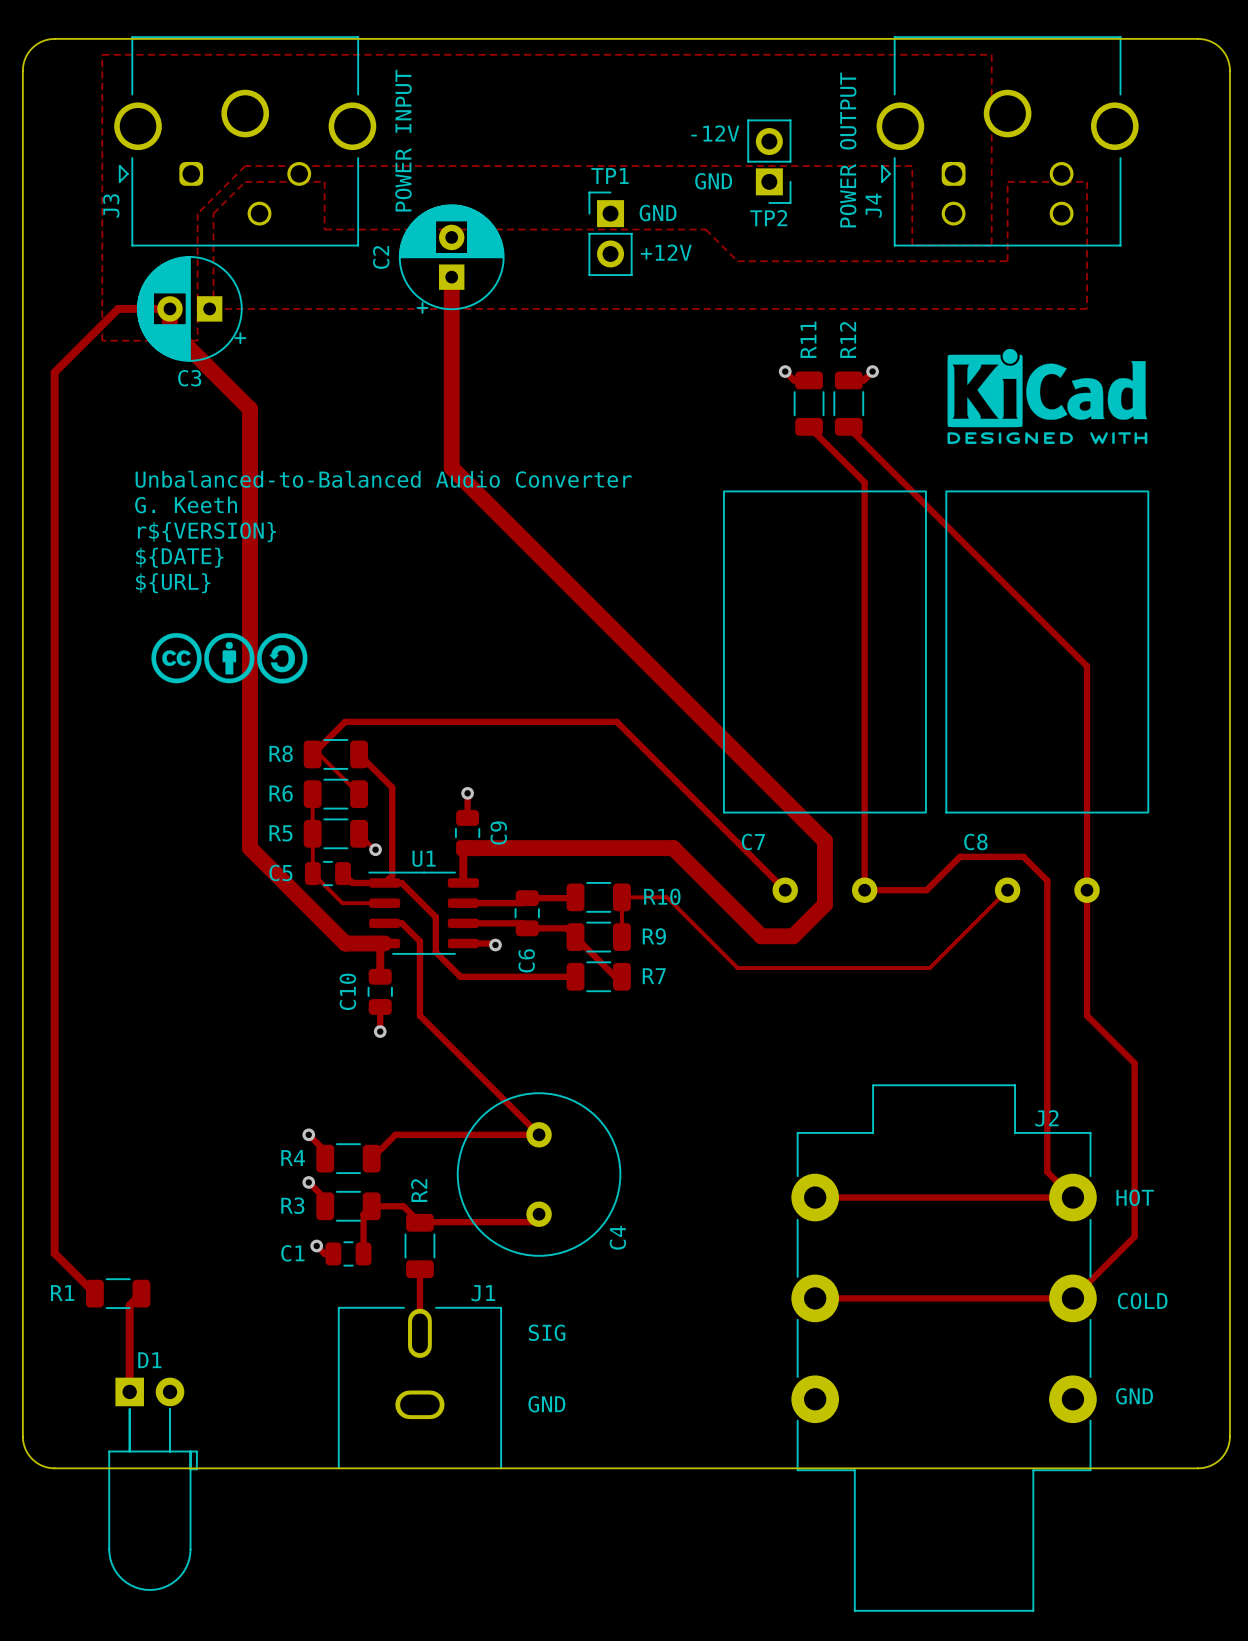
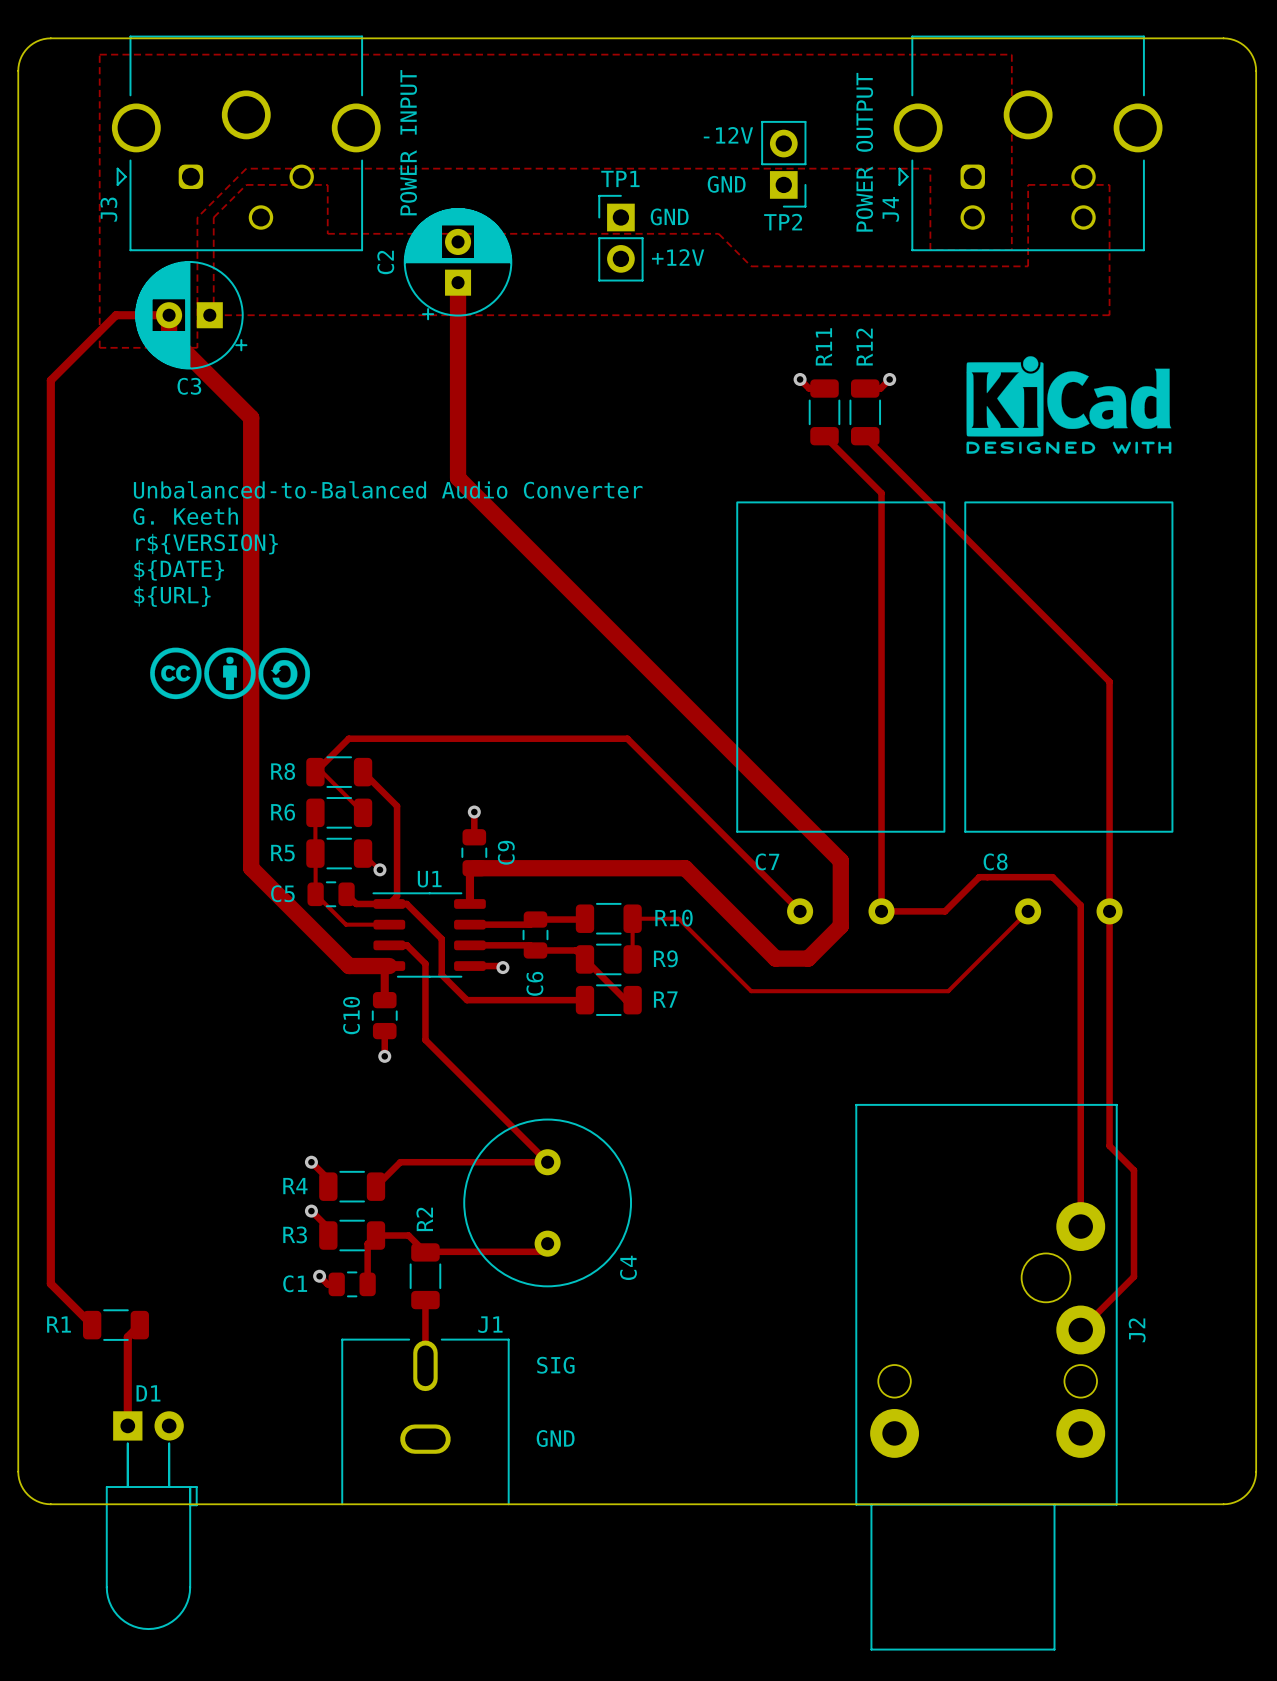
track: (1023, 856) (1047, 880) (1047, 1171) (1072, 1197) (815, 1197) -> (1044, 877) (1052, 877) (1080, 905) (1080, 1226)
track: (1087, 1015) (1134, 1063) (1134, 1236) (1072, 1298) (815, 1298) -> (1109, 1040) (1109, 1145) (1134, 1170) (1134, 1276) (1080, 1329)
J2 footprint: [791, 1084, 1097, 1612] -> [855, 1103, 1118, 1651]
J2 name position: J2 (1046, 1118) -> J2 (1137, 1330)

